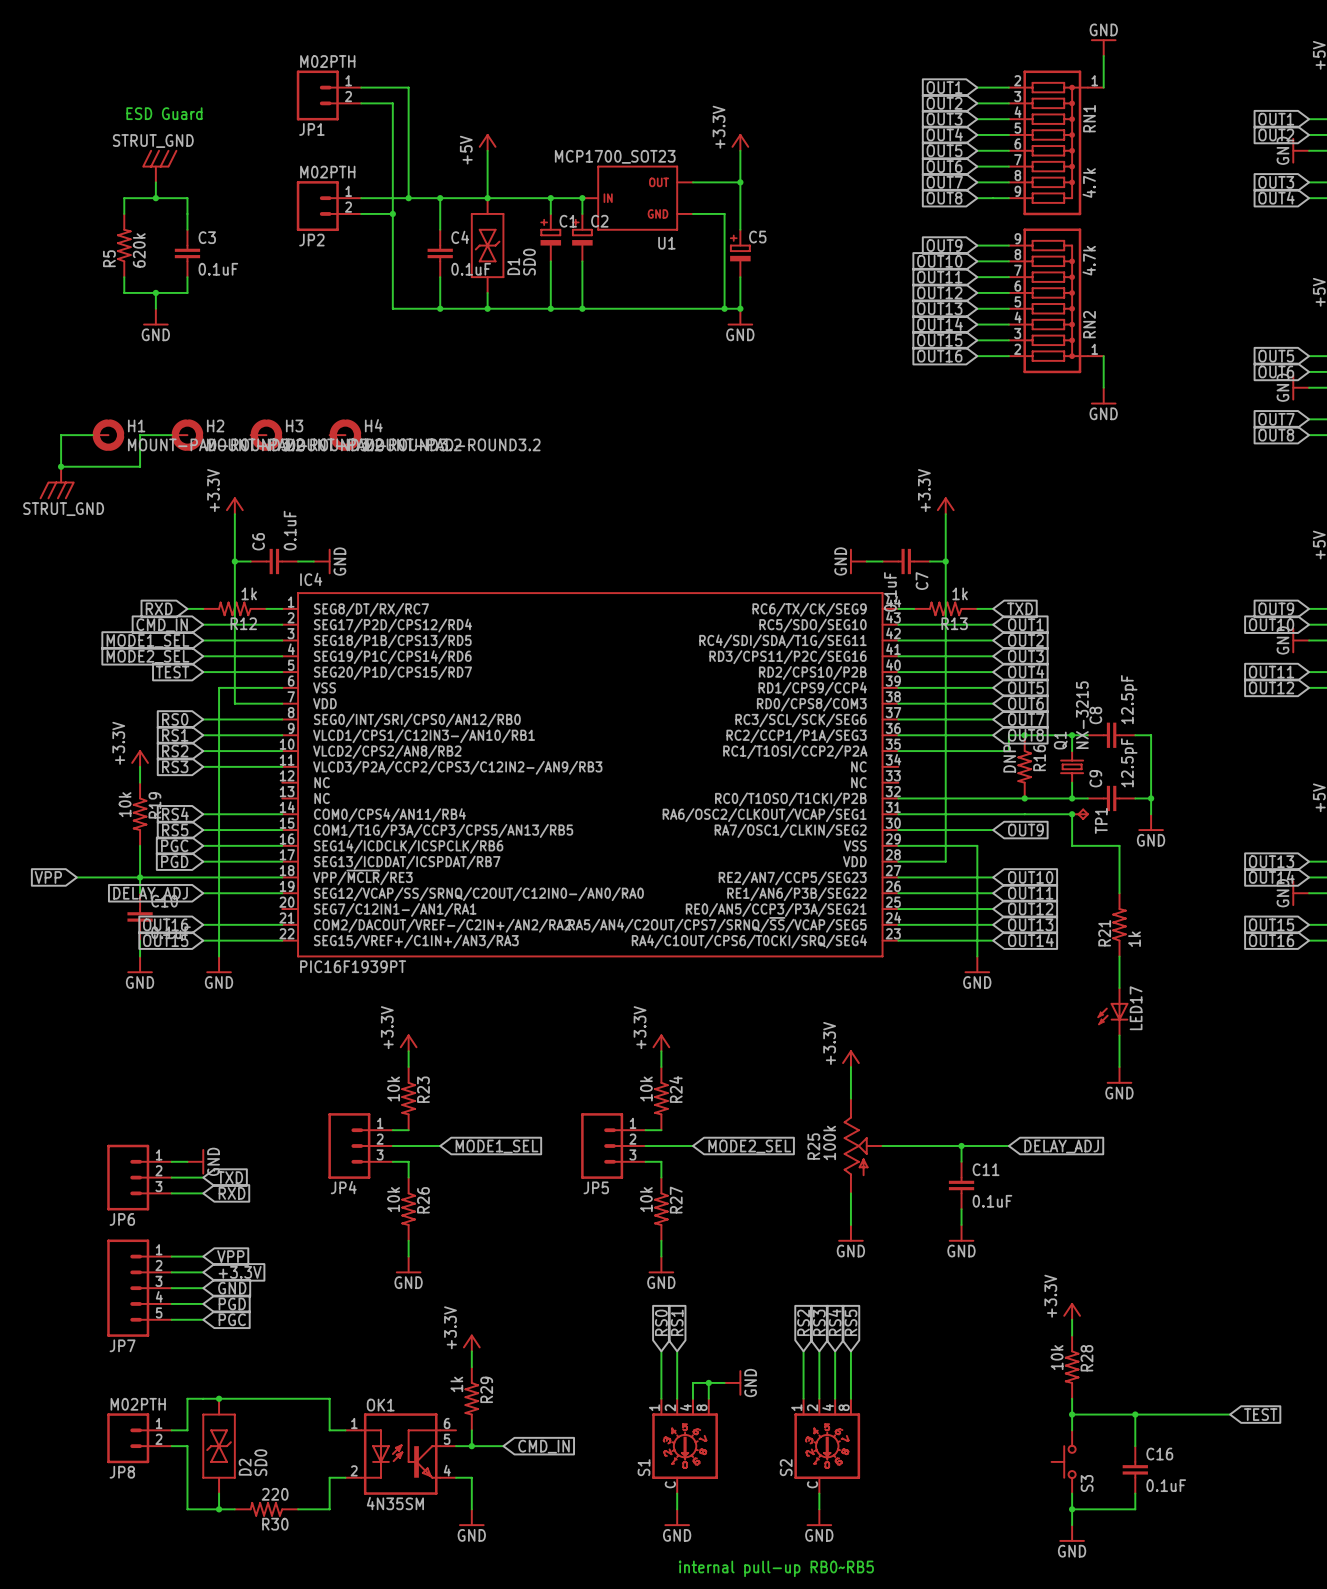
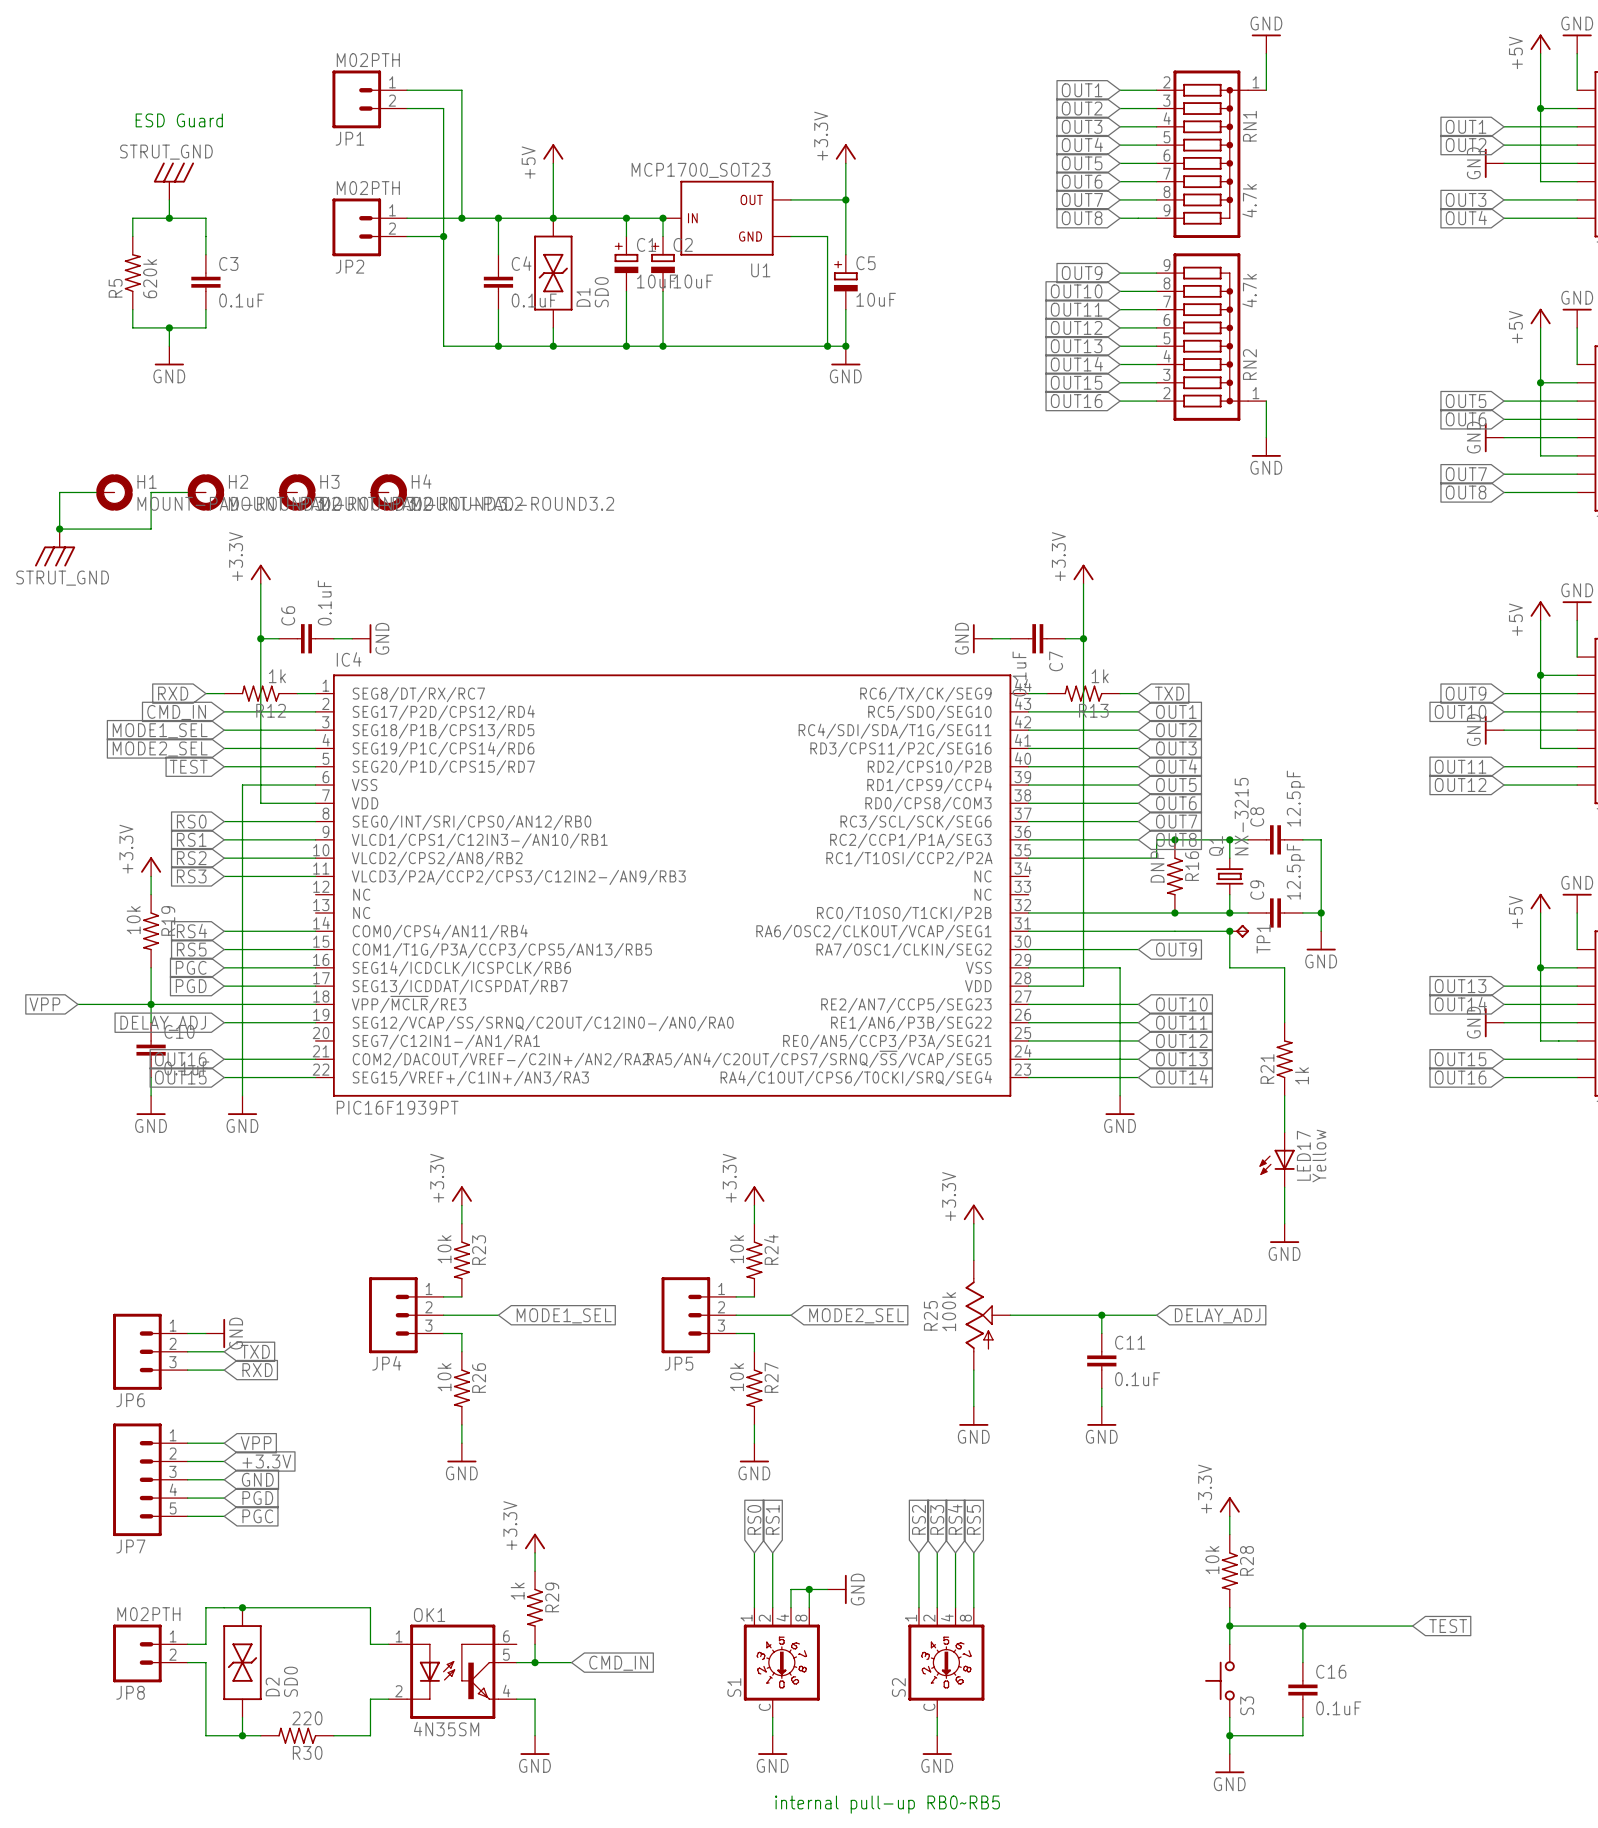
C1 value: none -> 10uF (656, 281)
C2 value: none -> 10uF (693, 281)
C5 value: none -> 10uF (876, 299)
LED17 value: none -> Yellow (1319, 1156)

